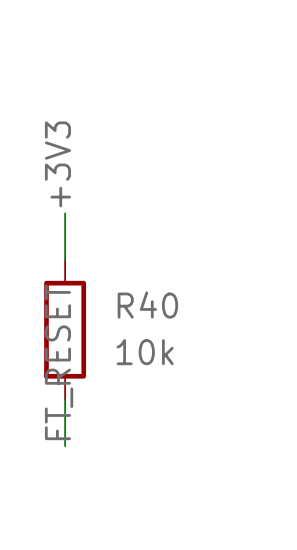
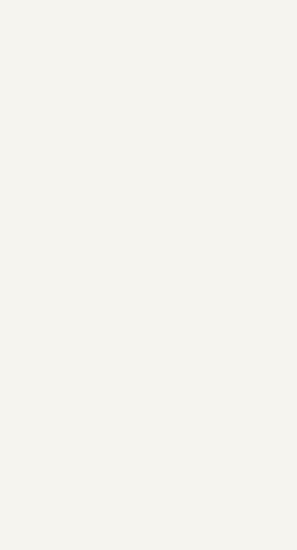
label: +3V3 (57, 164) -> none
wire: (65, 213) (65, 259) -> none
R40: 10k (65, 329) -> none
label: FT_RESET (59, 362) -> none
wire: (65, 399) (65, 446) -> none

